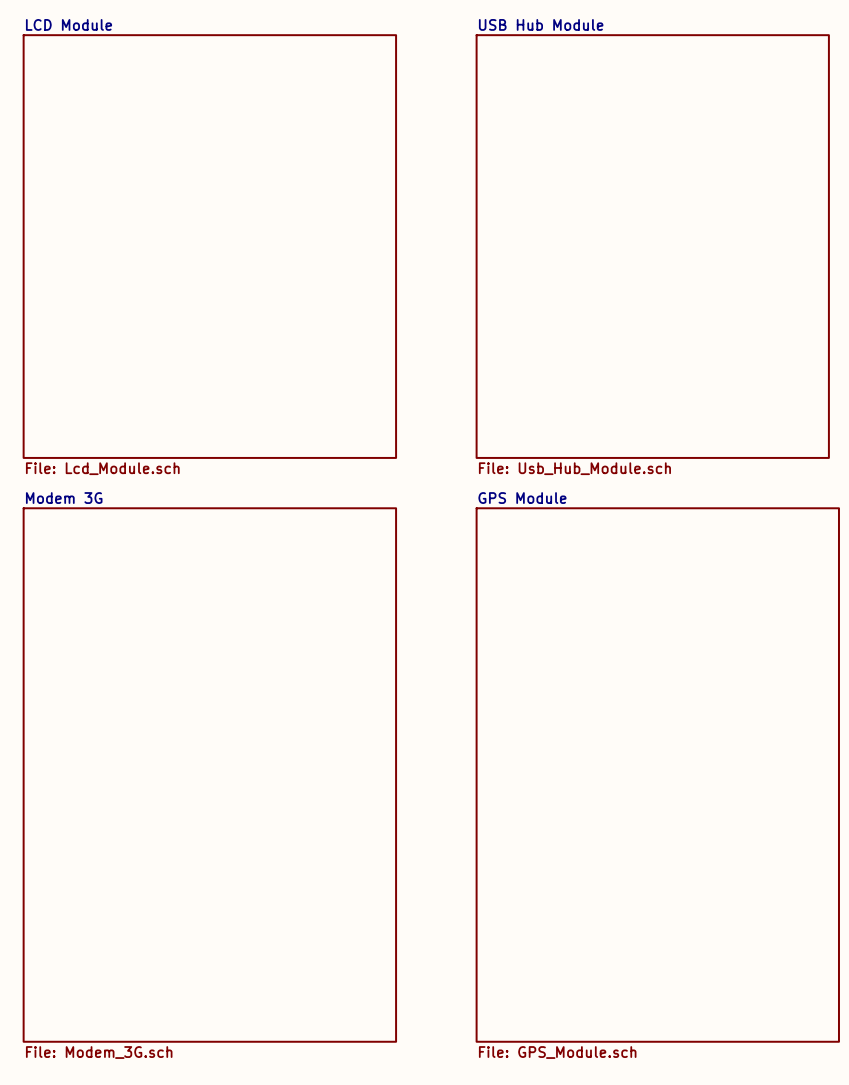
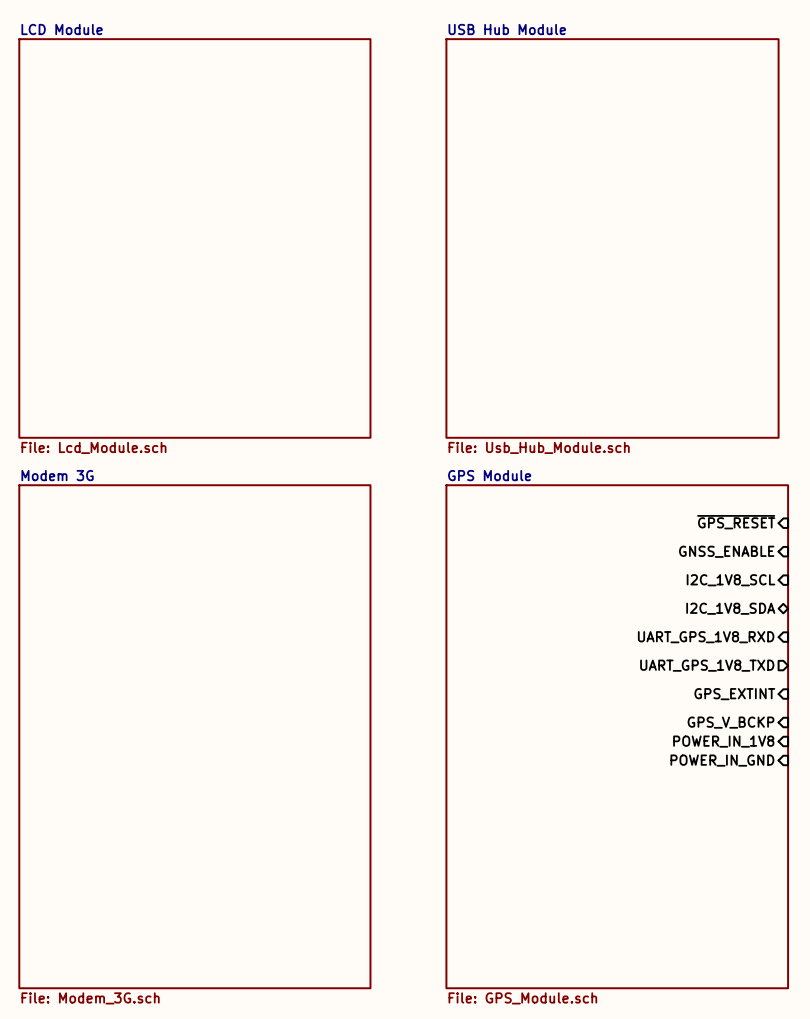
sheet pin: none -> ~{GPS_RESET} (736, 522)
sheet pin: none -> GNSS_ENABLE (726, 551)
sheet pin: none -> I2C_1V8_SCL (730, 580)
sheet pin: none -> I2C_1V8_SDA (730, 608)
sheet pin: none -> UART_GPS_1V8_RXD (706, 637)
sheet pin: none -> UART_GPS_1V8_TXD (707, 665)
sheet pin: none -> GPS_EXTINT (734, 694)
sheet pin: none -> GPS_V_BCKP (730, 722)
sheet pin: none -> POWER_IN_1V8 (723, 741)
sheet pin: none -> POWER_IN_GND (722, 760)

